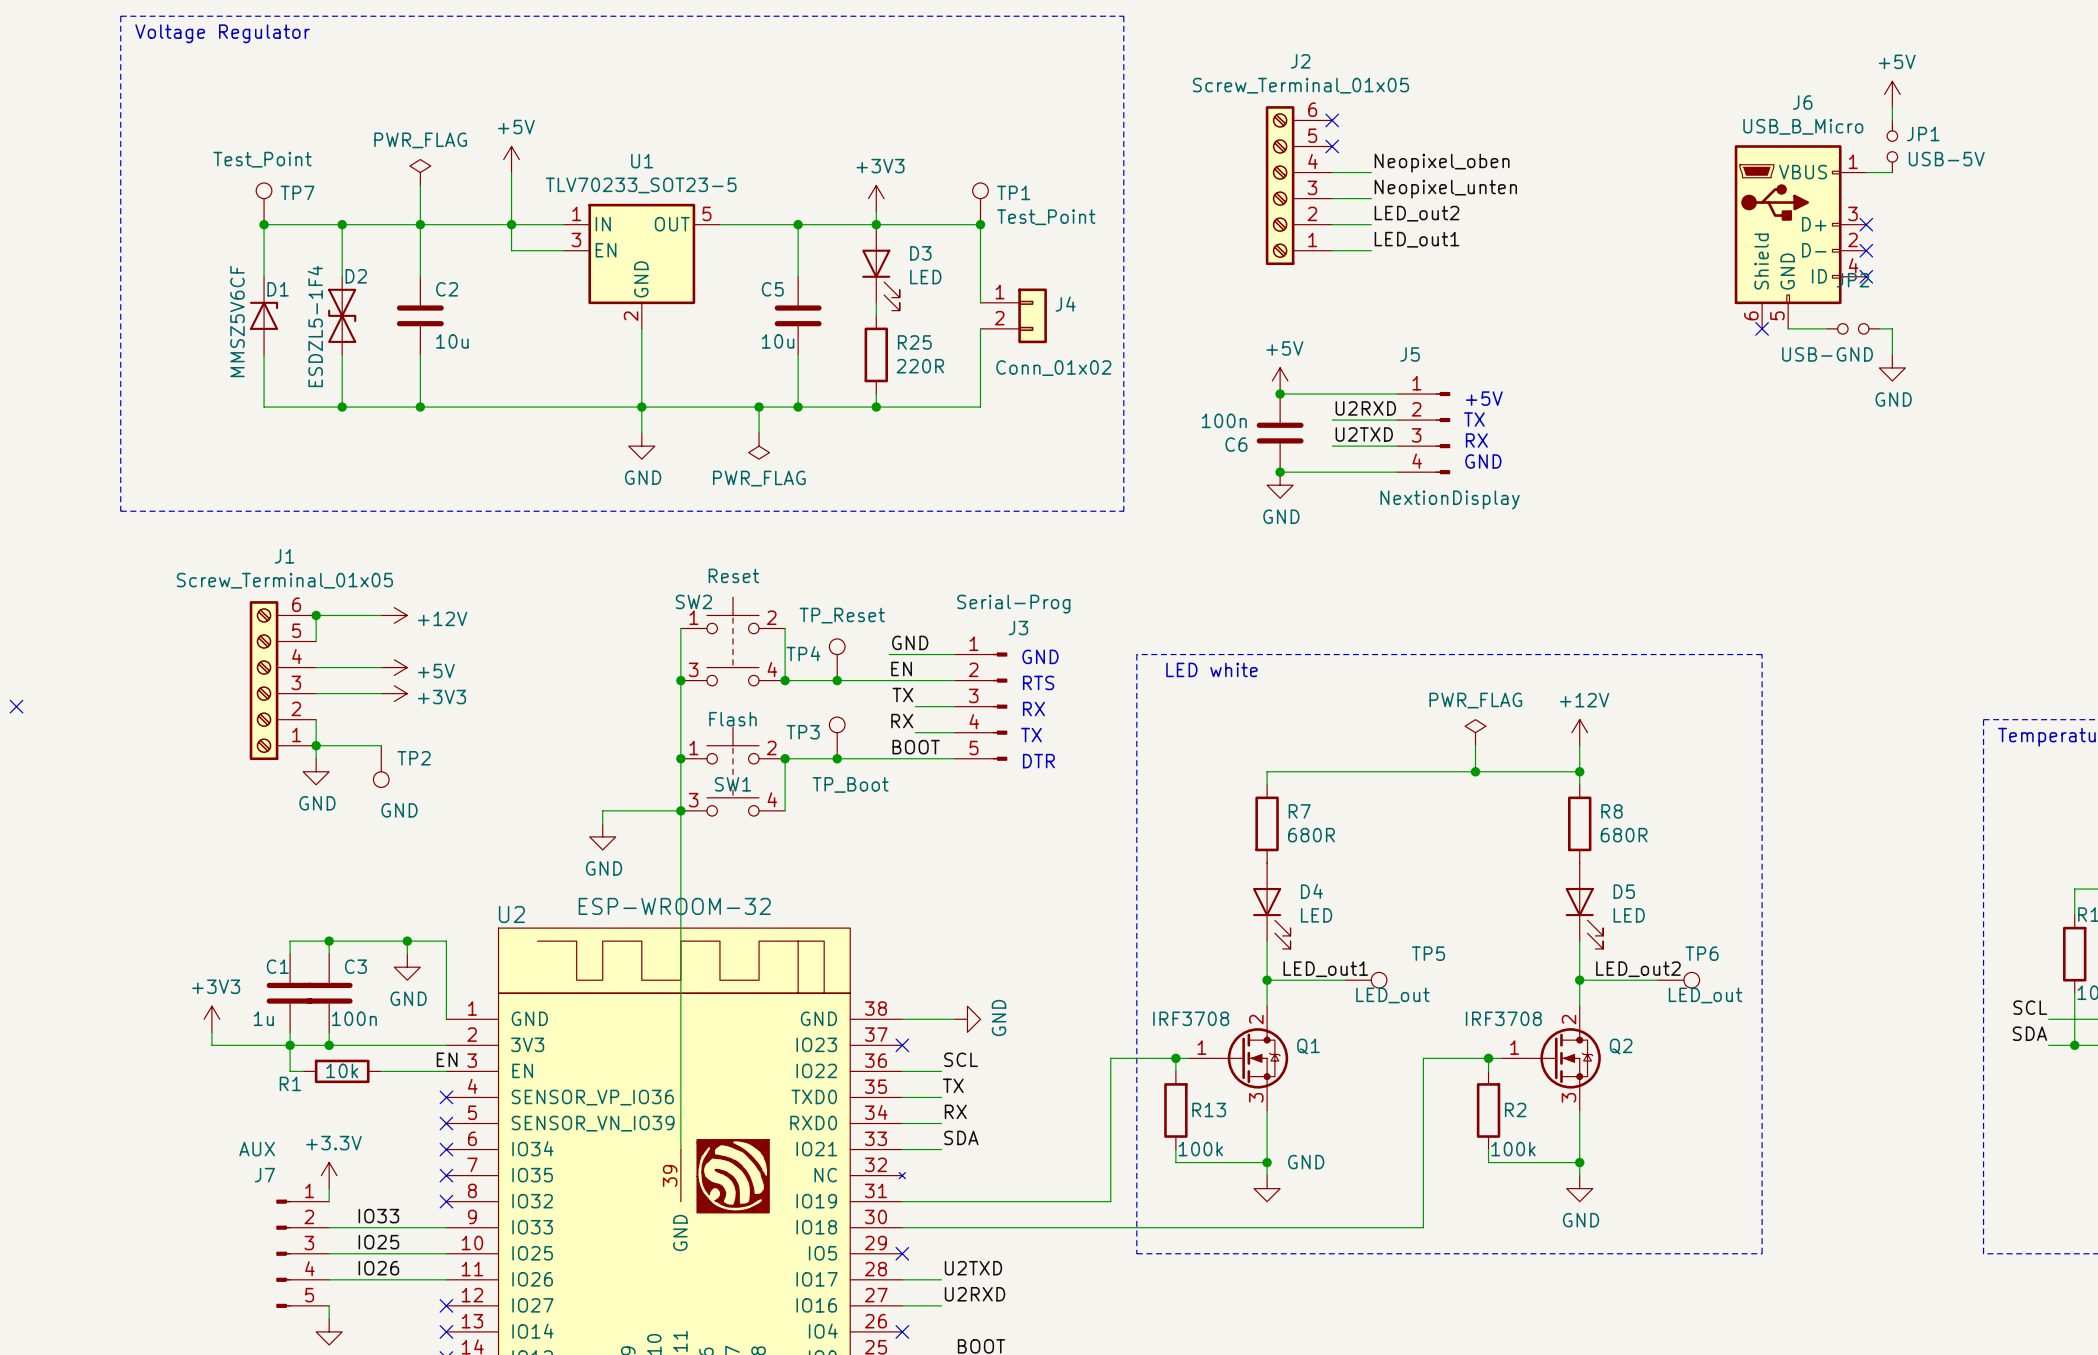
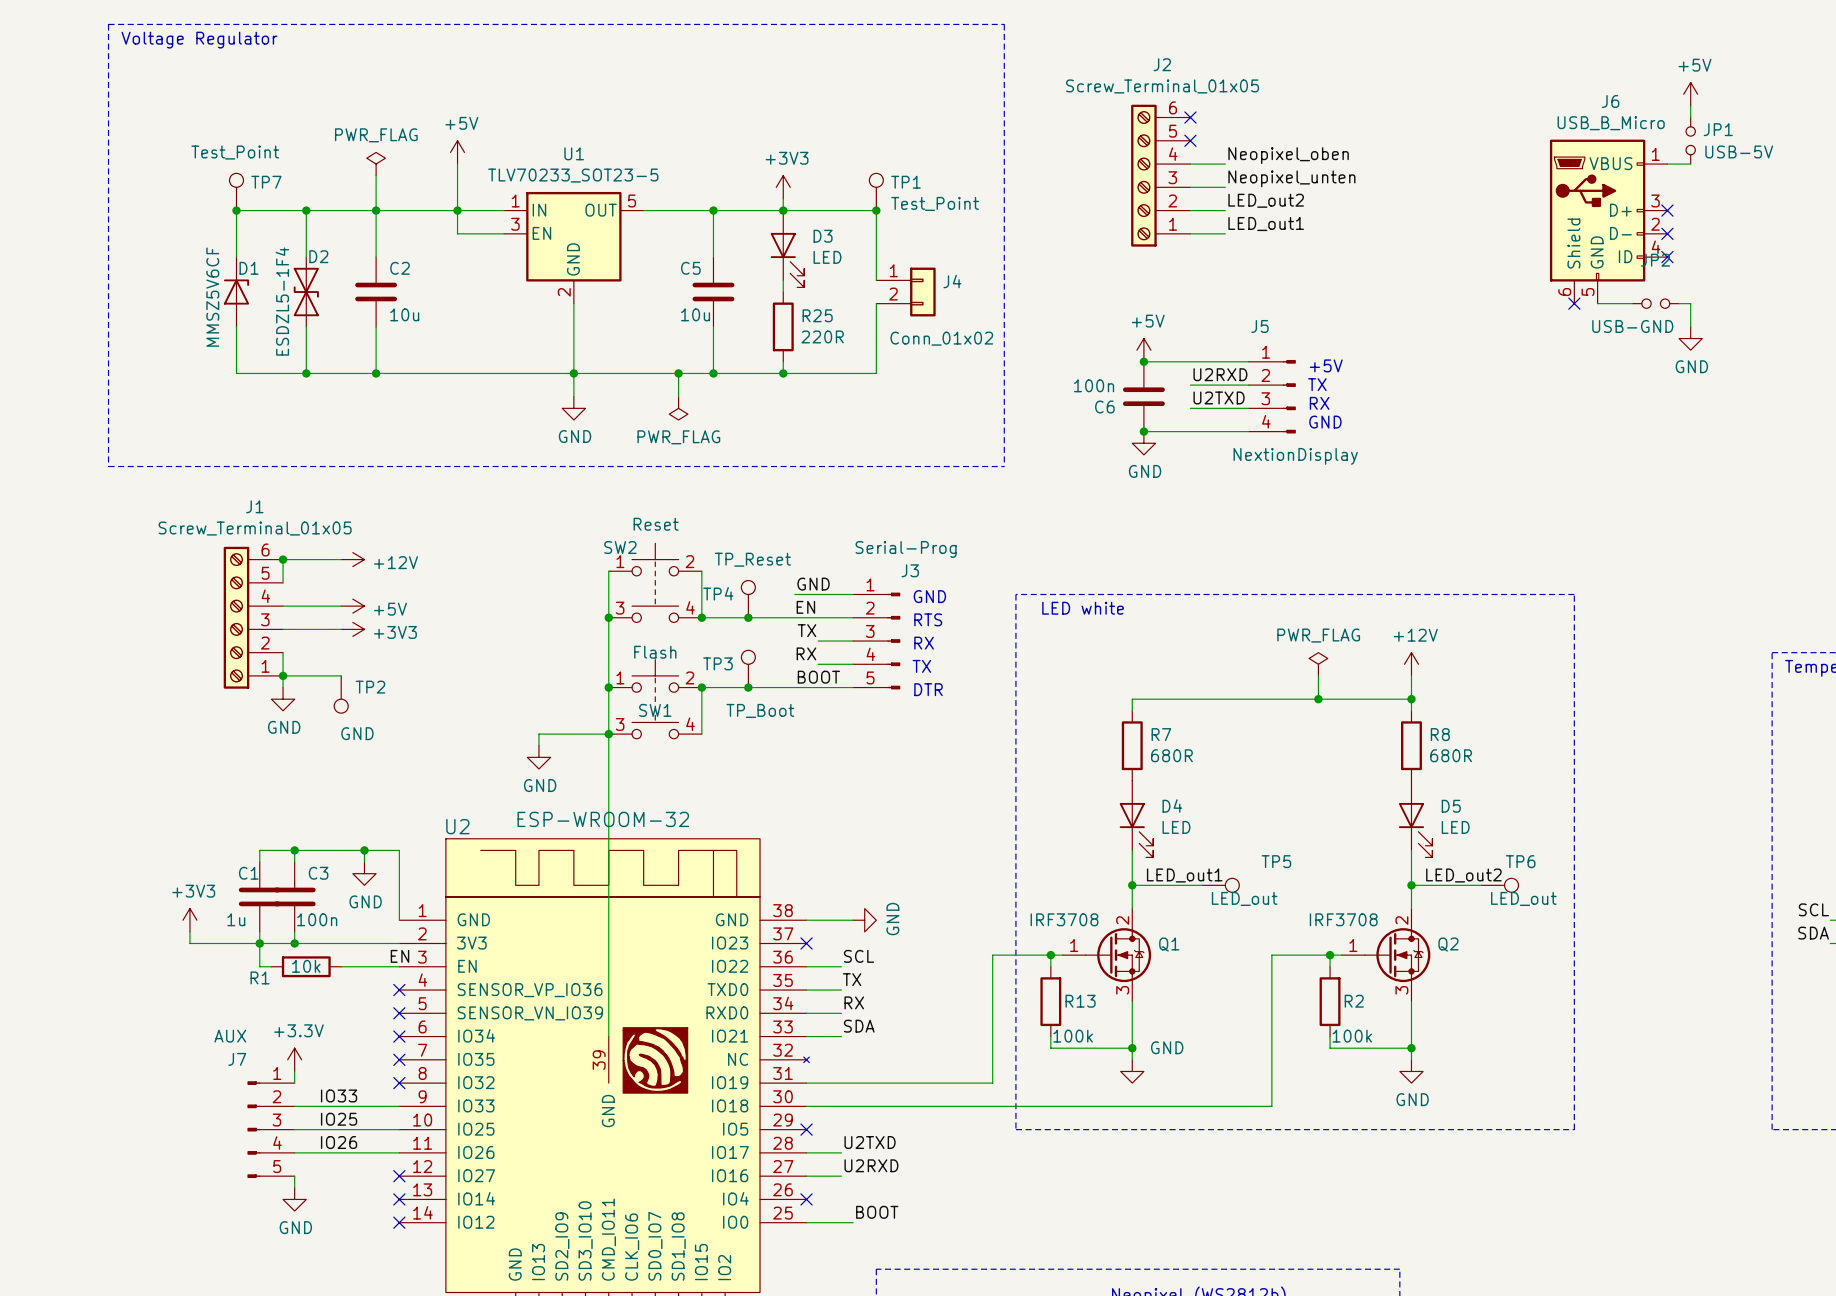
no-connect mark: (16, 706) -> none

